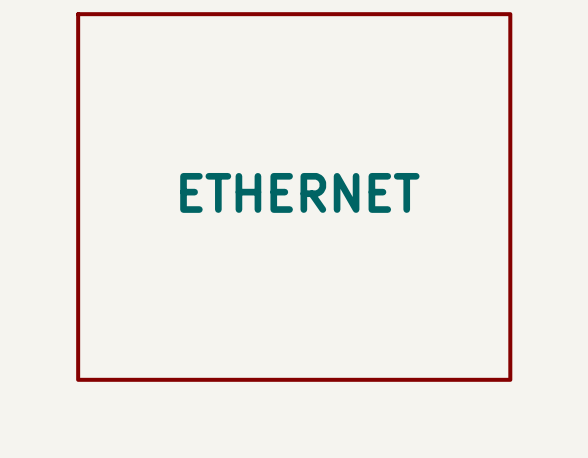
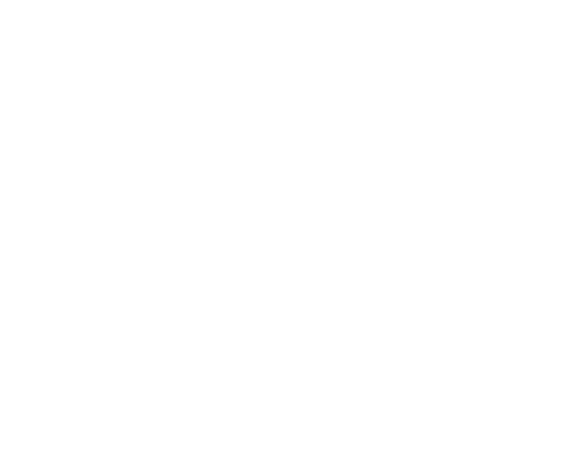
sheet ETHERNET: (294, 196) -> none

